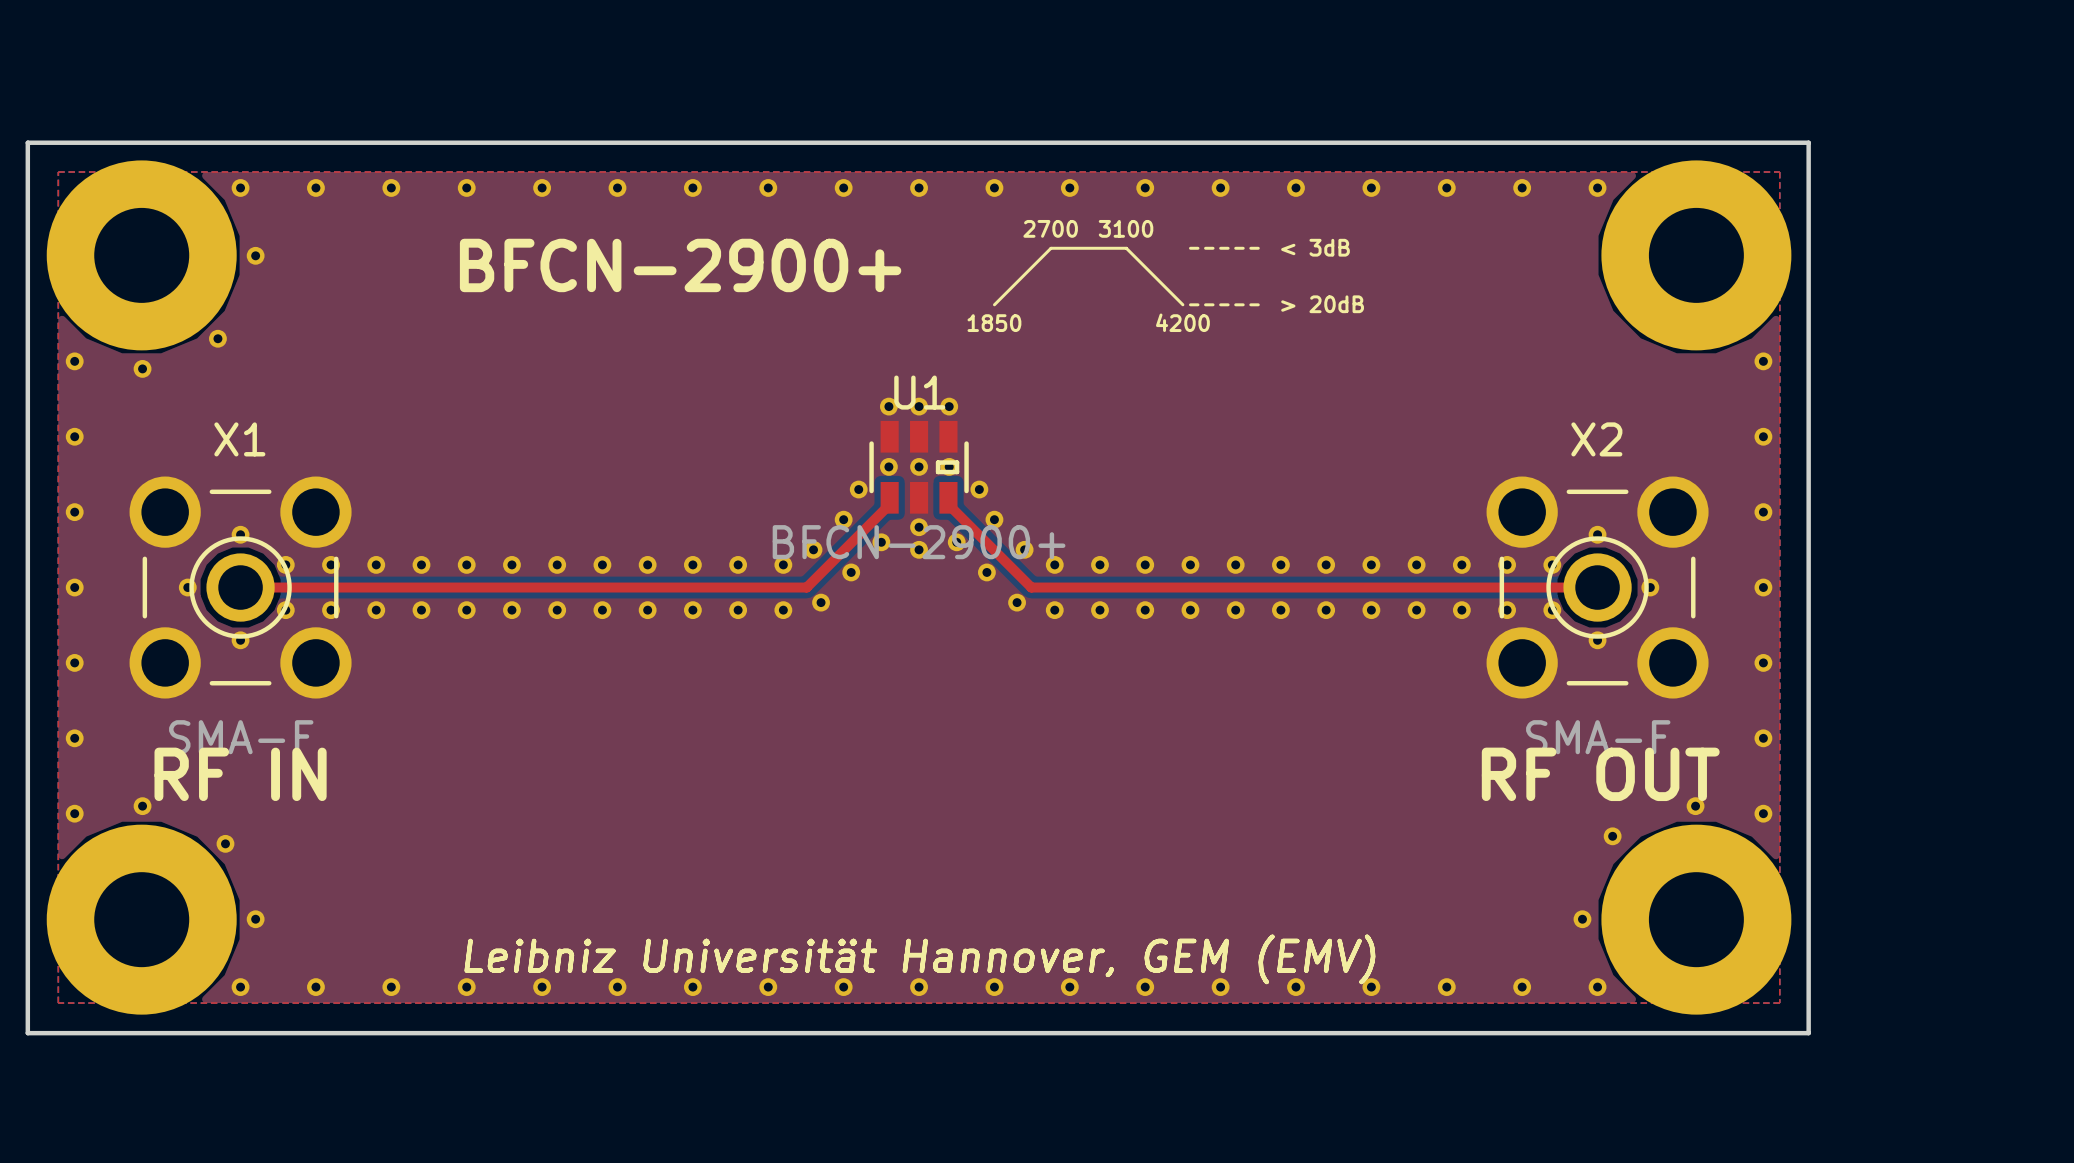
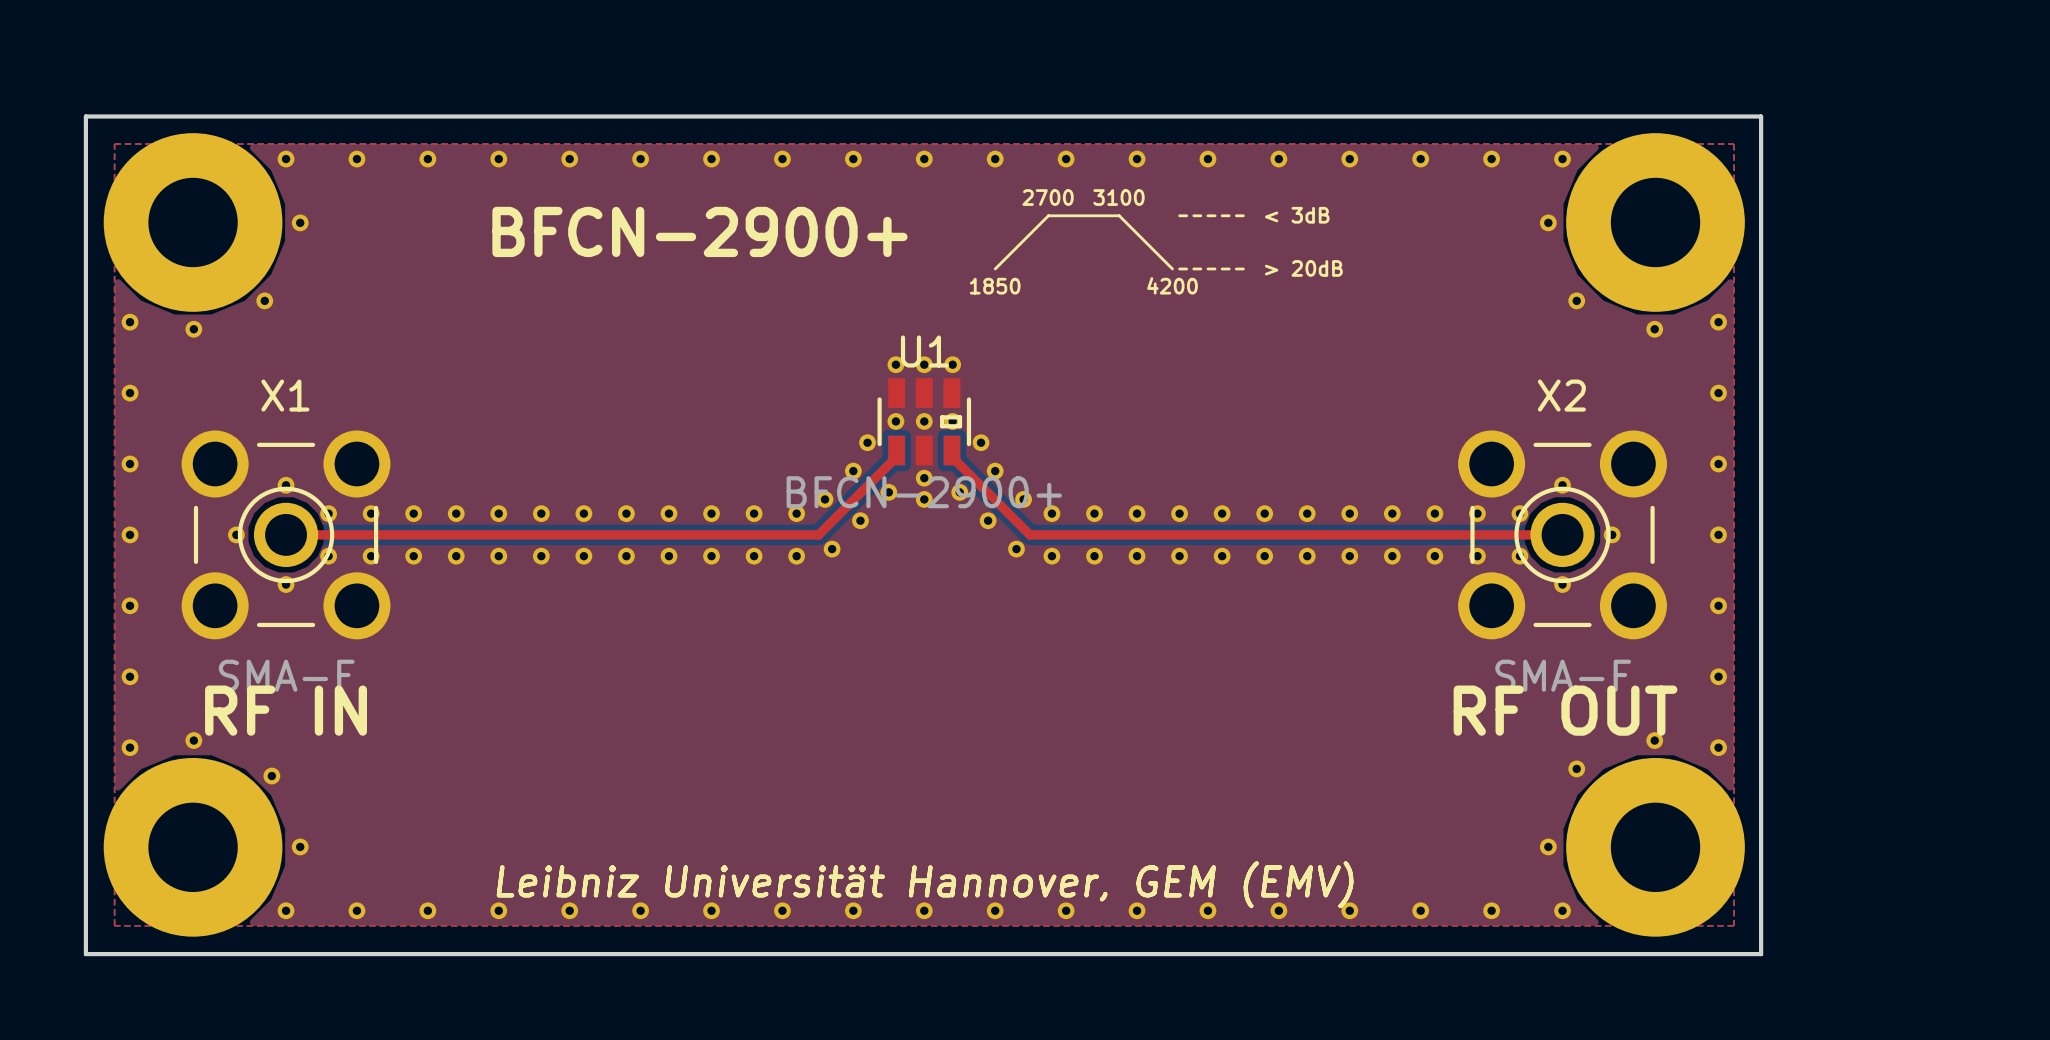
part: none -> (1548, 222)
part: none -> (1576, 300)
part: none -> (1654, 329)

